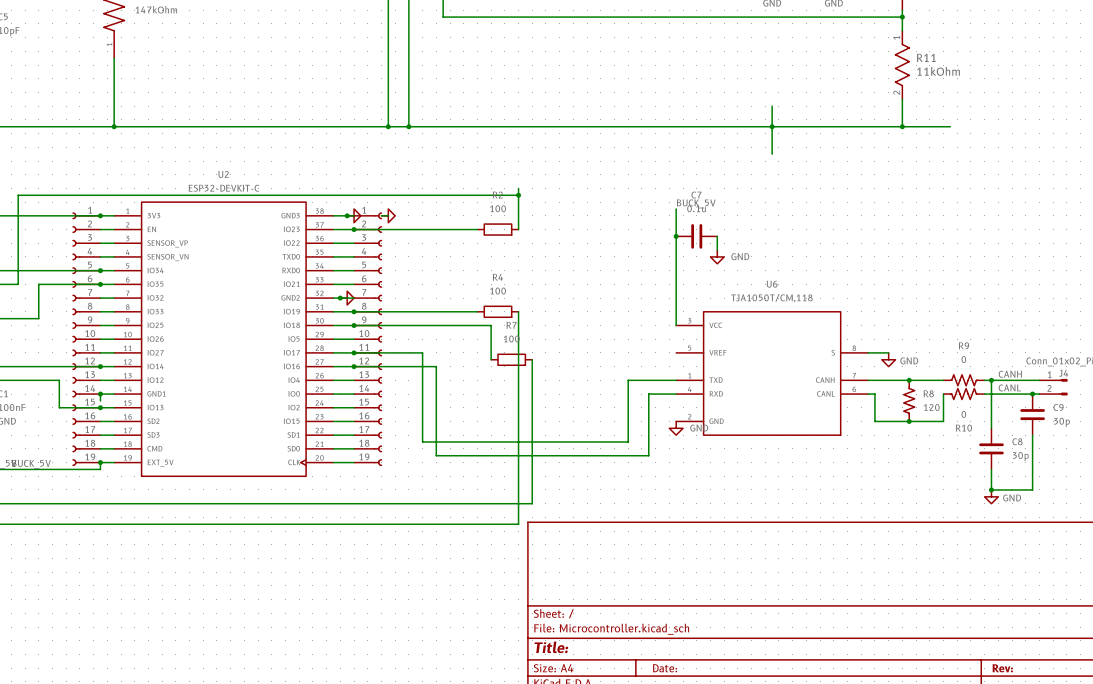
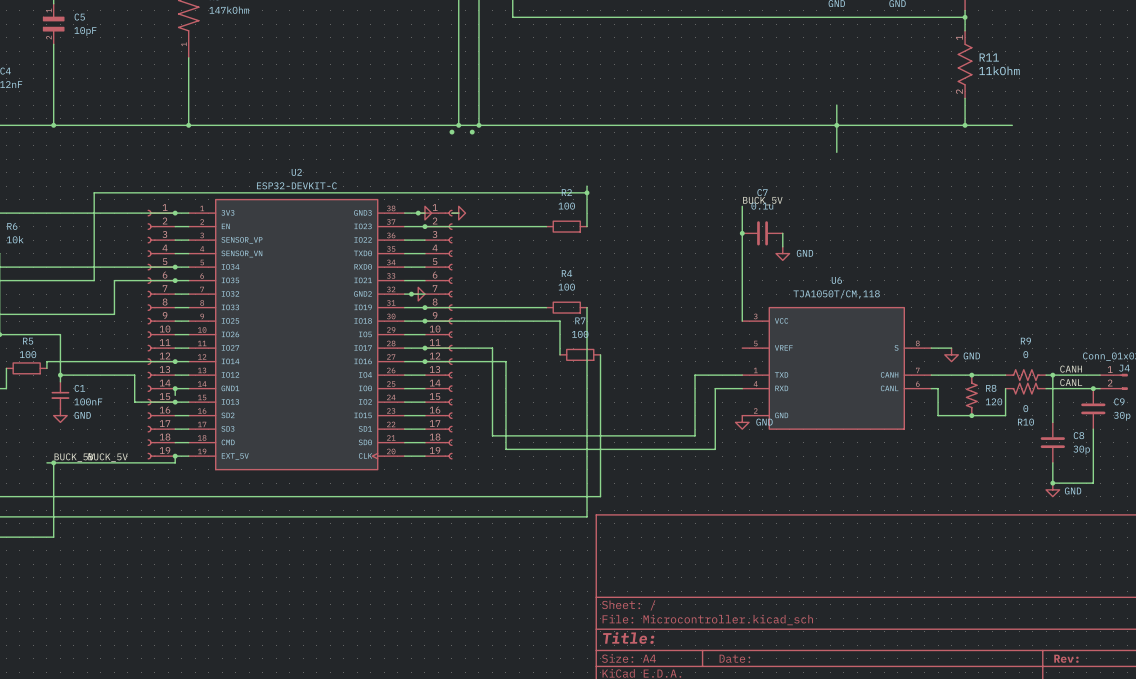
junction: none -> (451, 132)
junction: none -> (472, 132)

